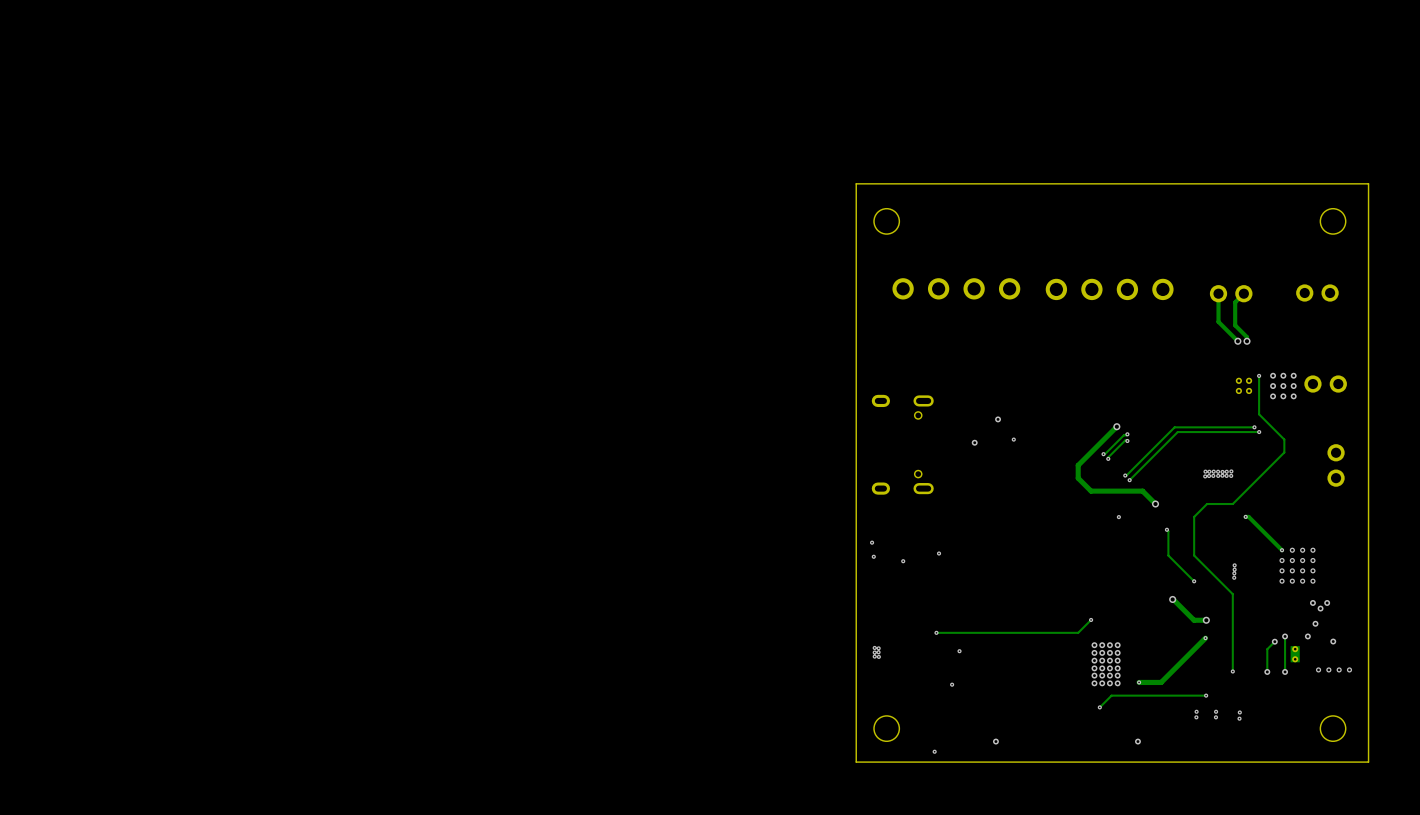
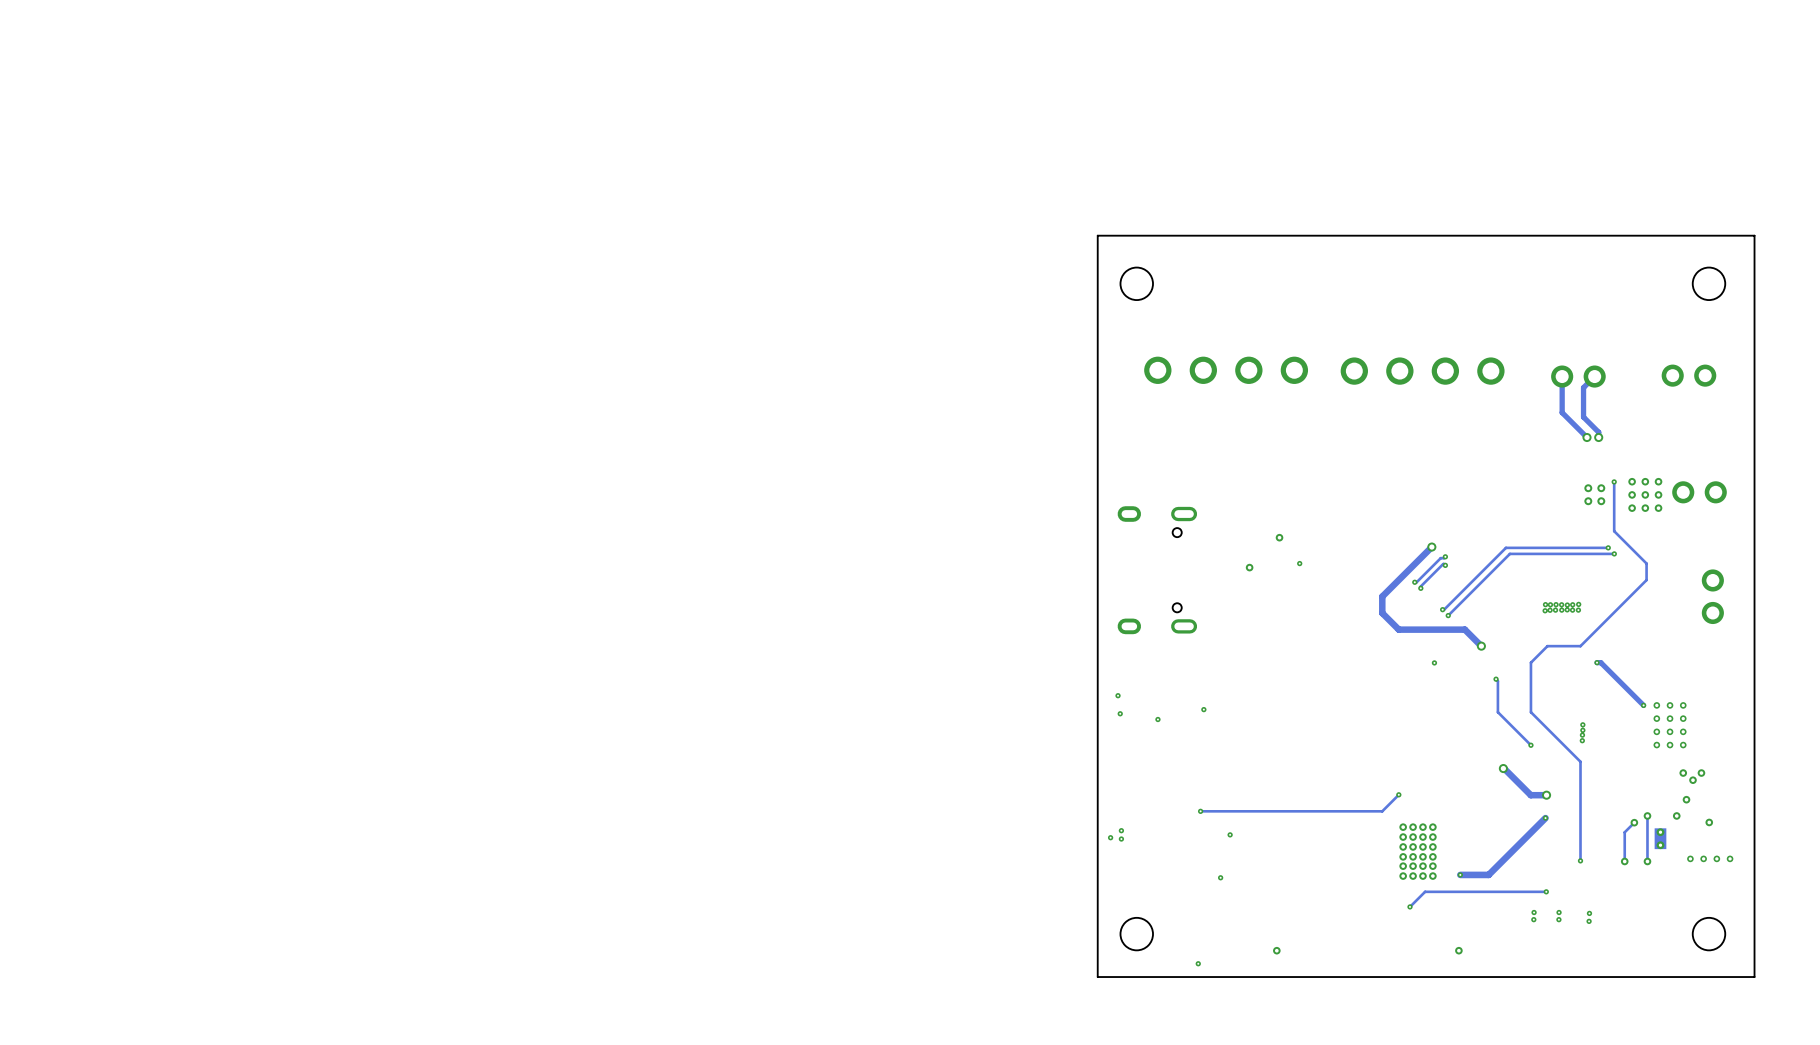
via: (1282, 560) -> none
via: (1282, 570) -> none
via: (1282, 581) -> none
via: (878, 648) -> none
via: (874, 652) -> none
via: (878, 652) -> none
via: none -> (1110, 837)
via: none -> (1121, 839)
via: (874, 656) -> none
via: (878, 656) -> none

